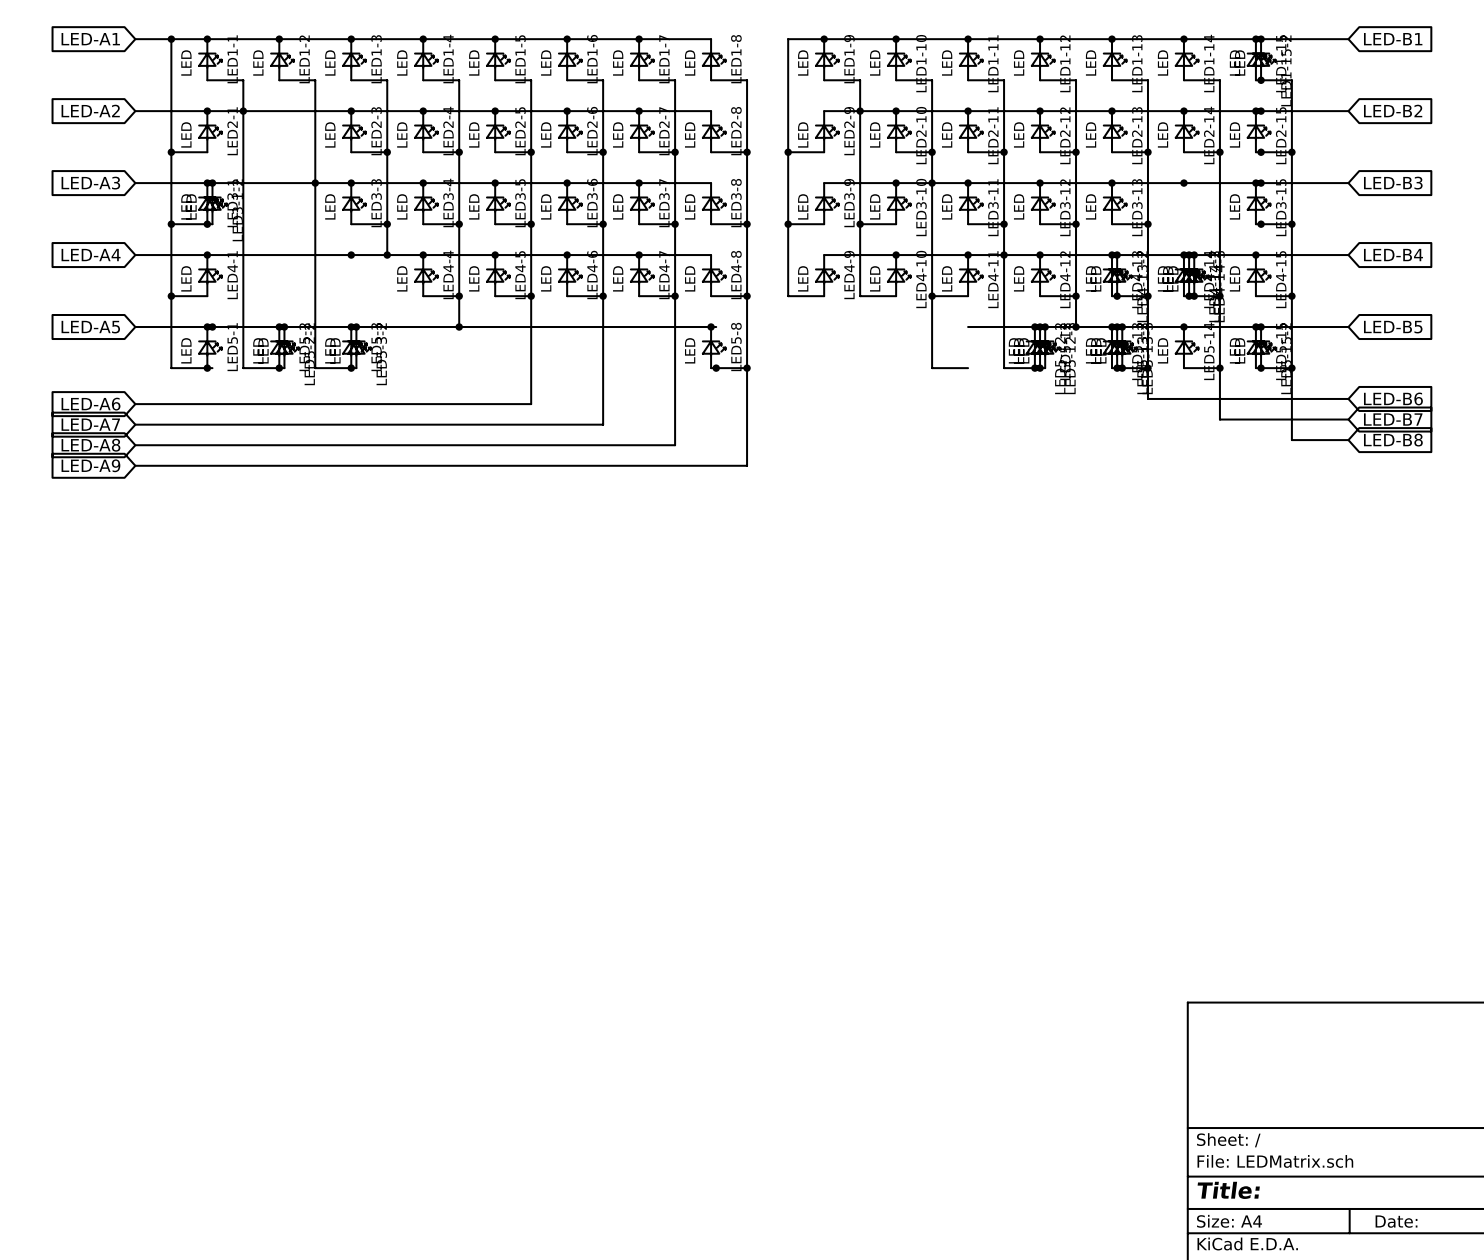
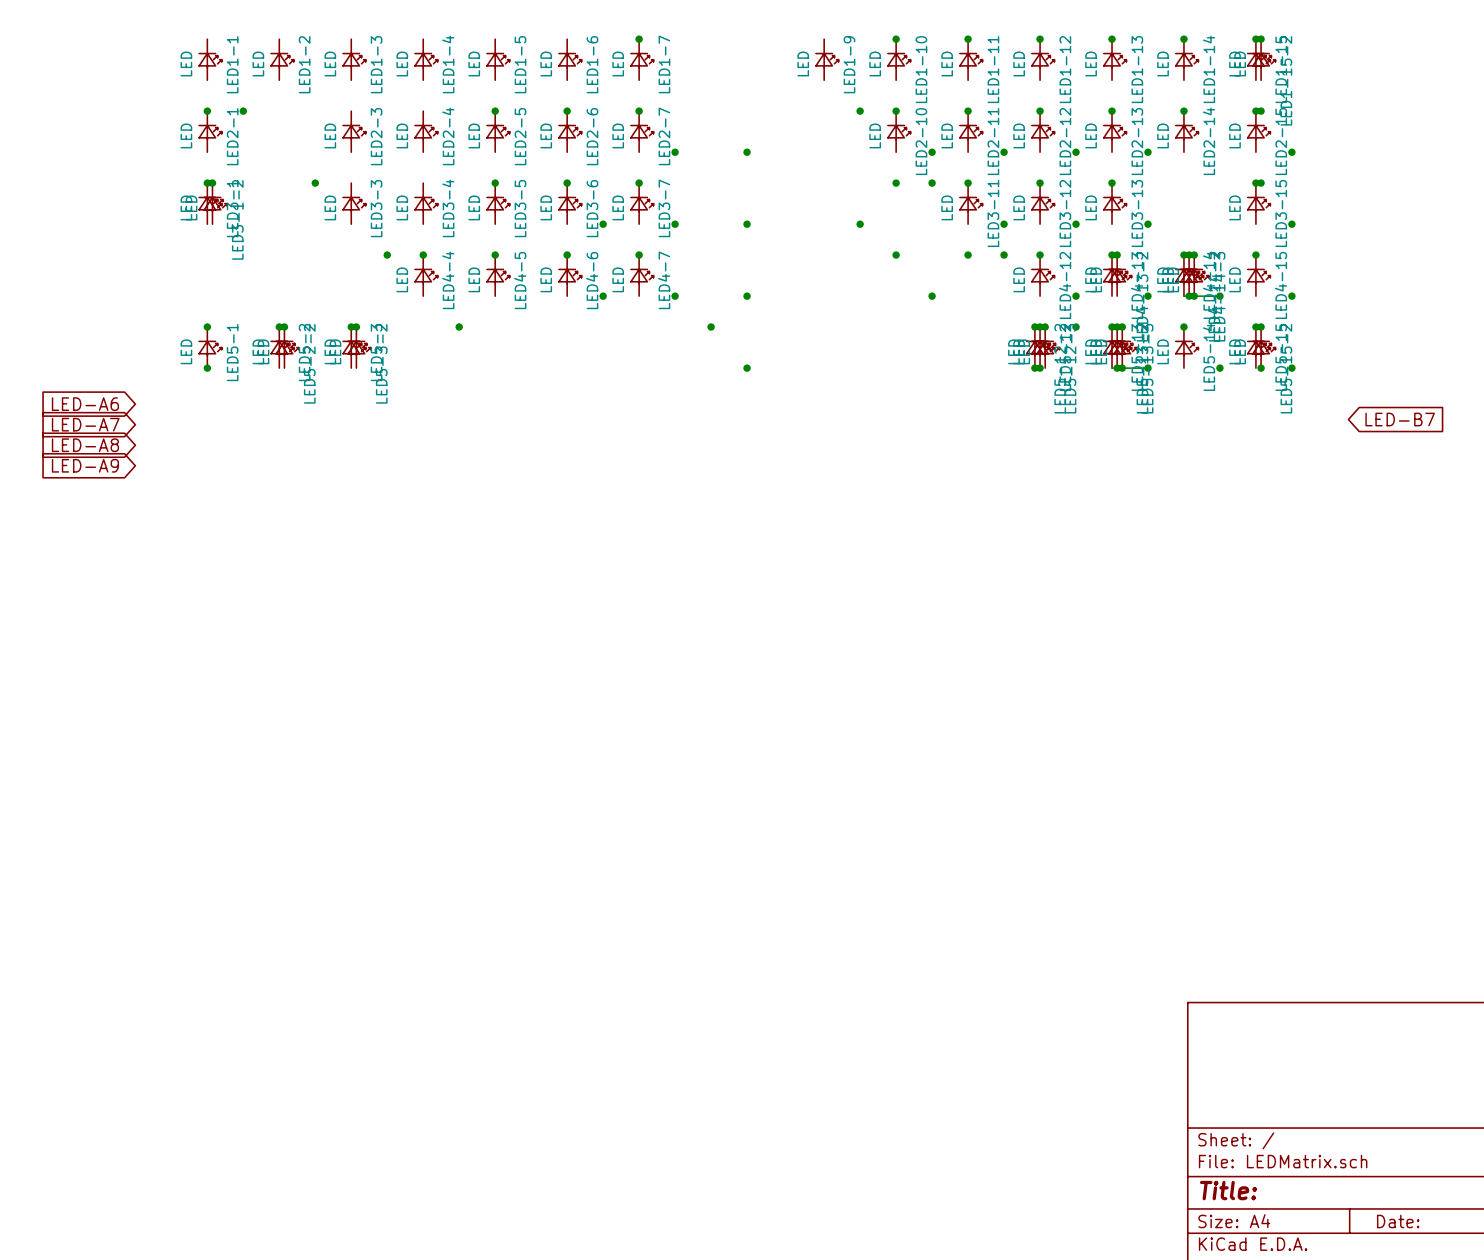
global label: LED-A1 (90, 39) -> none
wire: (135, 39) (711, 39) -> none
wire: (171, 39) (171, 368) (212, 368) -> none
junction: (171, 39) -> none
junction: (207, 39) -> none
junction: (279, 39) -> none
junction: (351, 39) -> none
junction: (423, 39) -> none
junction: (495, 39) -> none
junction: (567, 39) -> none
junction: (824, 39) -> none
wire: (1348, 39) (788, 39) (788, 296) (824, 296) -> none
global label: LED-B1 (1393, 39) -> none
LED1-8: LED (714, 59) -> none
wire: (207, 80) (243, 80) (243, 368) (284, 368) -> none
wire: (279, 80) (315, 80) (315, 368) (356, 368) -> none
wire: (351, 80) (387, 80) (387, 255) -> none
wire: (423, 80) (459, 80) (459, 327) -> none
wire: (495, 80) (531, 80) (531, 404) (135, 404) -> none
wire: (567, 80) (603, 80) (603, 424) (135, 424) -> none
wire: (639, 80) (675, 80) (675, 445) (135, 445) -> none
wire: (711, 80) (747, 80) (747, 465) (135, 465) -> none
wire: (824, 80) (860, 80) (860, 296) (896, 296) -> none
wire: (896, 80) (932, 80) (932, 368) (968, 368) -> none
wire: (968, 80) (1004, 80) (1004, 368) (1045, 368) -> none
wire: (1040, 80) (1076, 80) (1076, 327) -> none
wire: (1112, 80) (1147, 80) (1147, 398) (1348, 398) -> none
wire: (1183, 80) (1219, 80) (1219, 419) (1348, 419) -> none
wire: (1255, 80) (1291, 80) (1291, 440) (1348, 440) -> none
junction: (1261, 80) -> none
global label: LED-A2 (90, 111) -> none
wire: (135, 111) (711, 111) -> none
junction: (351, 111) -> none
junction: (423, 111) -> none
wire: (824, 111) (1348, 111) -> none
global label: LED-B2 (1393, 111) -> none
LED2-8: LED (714, 131) -> none
LED2-9: LED (827, 131) -> none
wire: (171, 152) (207, 152) -> none
junction: (171, 152) -> none
wire: (351, 152) (387, 152) -> none
junction: (387, 152) -> none
wire: (423, 152) (459, 152) -> none
junction: (459, 152) -> none
wire: (495, 152) (531, 152) -> none
junction: (531, 152) -> none
wire: (567, 152) (603, 152) -> none
junction: (603, 152) -> none
wire: (639, 152) (675, 152) -> none
wire: (711, 152) (747, 152) -> none
wire: (788, 152) (824, 152) -> none
junction: (788, 152) -> none
wire: (896, 152) (932, 152) -> none
wire: (968, 152) (1004, 152) -> none
wire: (1040, 152) (1076, 152) -> none
wire: (1112, 152) (1147, 152) -> none
wire: (1183, 152) (1219, 152) -> none
junction: (1219, 152) -> none
wire: (1255, 152) (1291, 152) -> none
junction: (1261, 152) -> none
global label: LED-A3 (90, 183) -> none
wire: (135, 183) (711, 183) -> none
junction: (351, 183) -> none
junction: (423, 183) -> none
wire: (824, 183) (1348, 183) -> none
junction: (1183, 183) -> none
global label: LED-B3 (1393, 183) -> none
LED3-8: LED (714, 203) -> none
LED3-9: LED (827, 203) -> none
LED3-10: LED (899, 203) -> none
wire: (171, 224) (212, 224) -> none
junction: (171, 224) -> none
junction: (207, 224) -> none
wire: (351, 224) (387, 224) -> none
junction: (387, 224) -> none
wire: (423, 224) (459, 224) -> none
junction: (459, 224) -> none
wire: (495, 224) (531, 224) -> none
junction: (531, 224) -> none
wire: (567, 224) (603, 224) -> none
wire: (639, 224) (675, 224) -> none
wire: (711, 224) (747, 224) -> none
wire: (788, 224) (824, 224) -> none
junction: (788, 224) -> none
wire: (860, 224) (896, 224) -> none
wire: (968, 224) (1004, 224) -> none
wire: (1040, 224) (1076, 224) -> none
wire: (1112, 224) (1147, 224) -> none
wire: (1255, 224) (1291, 224) -> none
junction: (1261, 224) -> none
global label: LED-A4 (91, 255) -> none
wire: (135, 255) (711, 255) -> none
junction: (207, 255) -> none
junction: (351, 255) -> none
wire: (824, 255) (1348, 255) -> none
global label: LED-B4 (1393, 255) -> none
LED4-1: LED (210, 275) -> none
LED4-8: LED (714, 275) -> none
LED4-9: LED (827, 275) -> none
LED4-10: LED (899, 275) -> none
LED4-11: LED (971, 275) -> none
wire: (171, 296) (207, 296) -> none
junction: (171, 296) -> none
wire: (423, 296) (459, 296) -> none
junction: (459, 296) -> none
wire: (495, 296) (531, 296) -> none
junction: (531, 296) -> none
wire: (567, 296) (603, 296) -> none
wire: (639, 296) (675, 296) -> none
wire: (711, 296) (747, 296) -> none
wire: (932, 296) (968, 296) -> none
wire: (1040, 296) (1076, 296) -> none
wire: (1112, 296) (1147, 296) -> none
junction: (1117, 296) -> none
wire: (1255, 296) (1291, 296) -> none
global label: LED-A5 (90, 327) -> none
wire: (135, 327) (716, 327) -> none
junction: (212, 327) -> none
wire: (968, 327) (1348, 327) -> none
global label: LED-B5 (1393, 327) -> none
LED5-8: LED (714, 347) -> none
junction: (279, 368) -> none
junction: (351, 368) -> none
wire: (711, 368) (747, 368) -> none
junction: (716, 368) -> none
wire: (1183, 368) (1219, 368) -> none
wire: (1255, 368) (1291, 368) -> none
global label: LED-B6 (1393, 398) -> none
global label: LED-B8 (1393, 440) -> none

